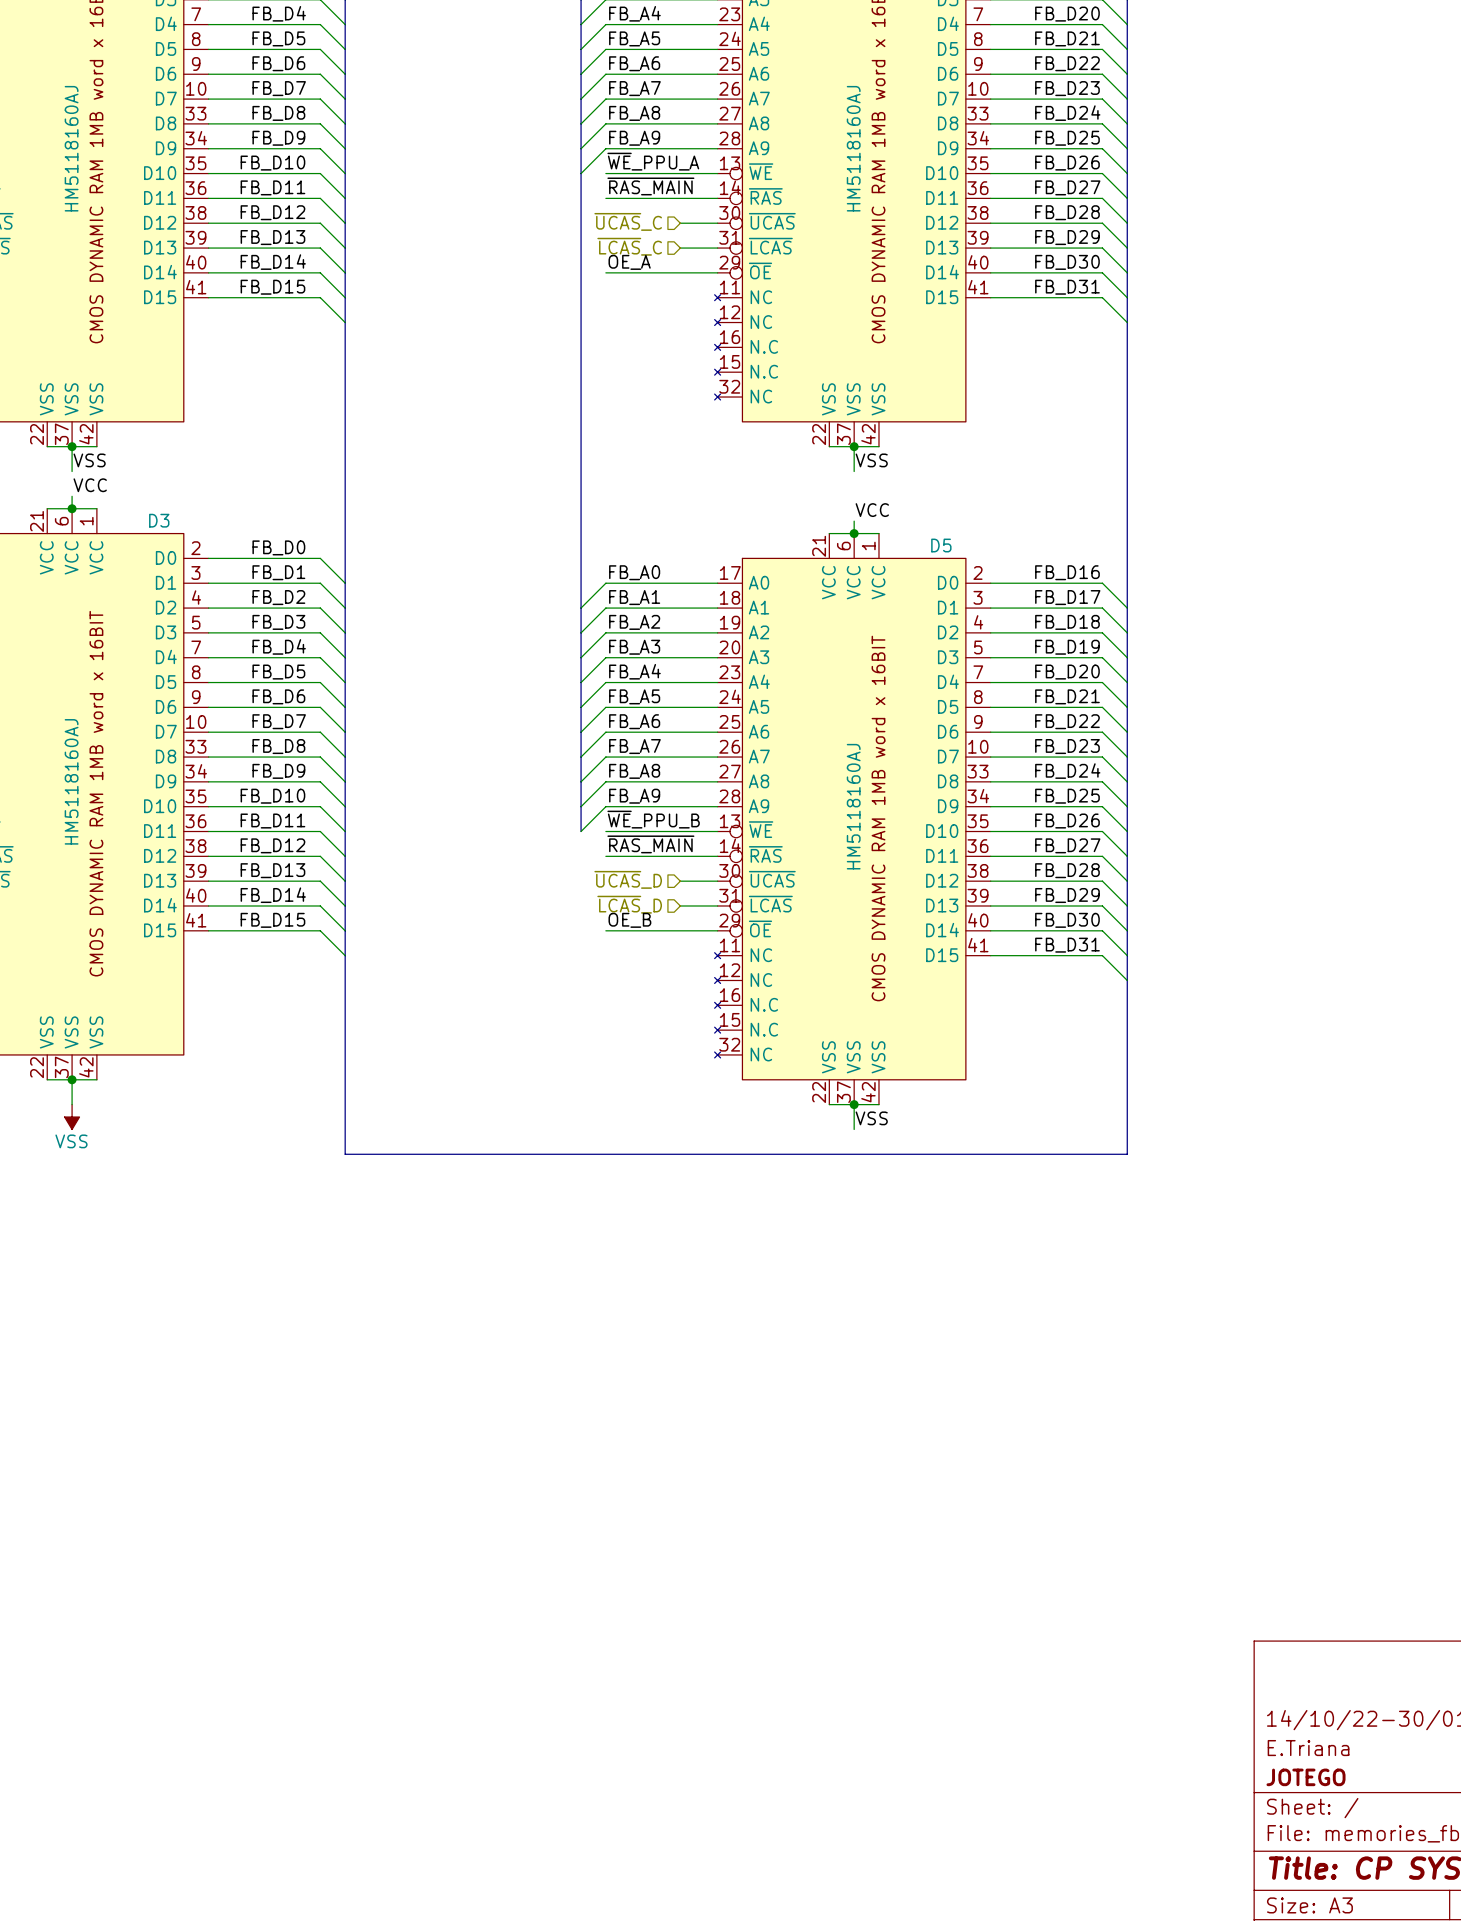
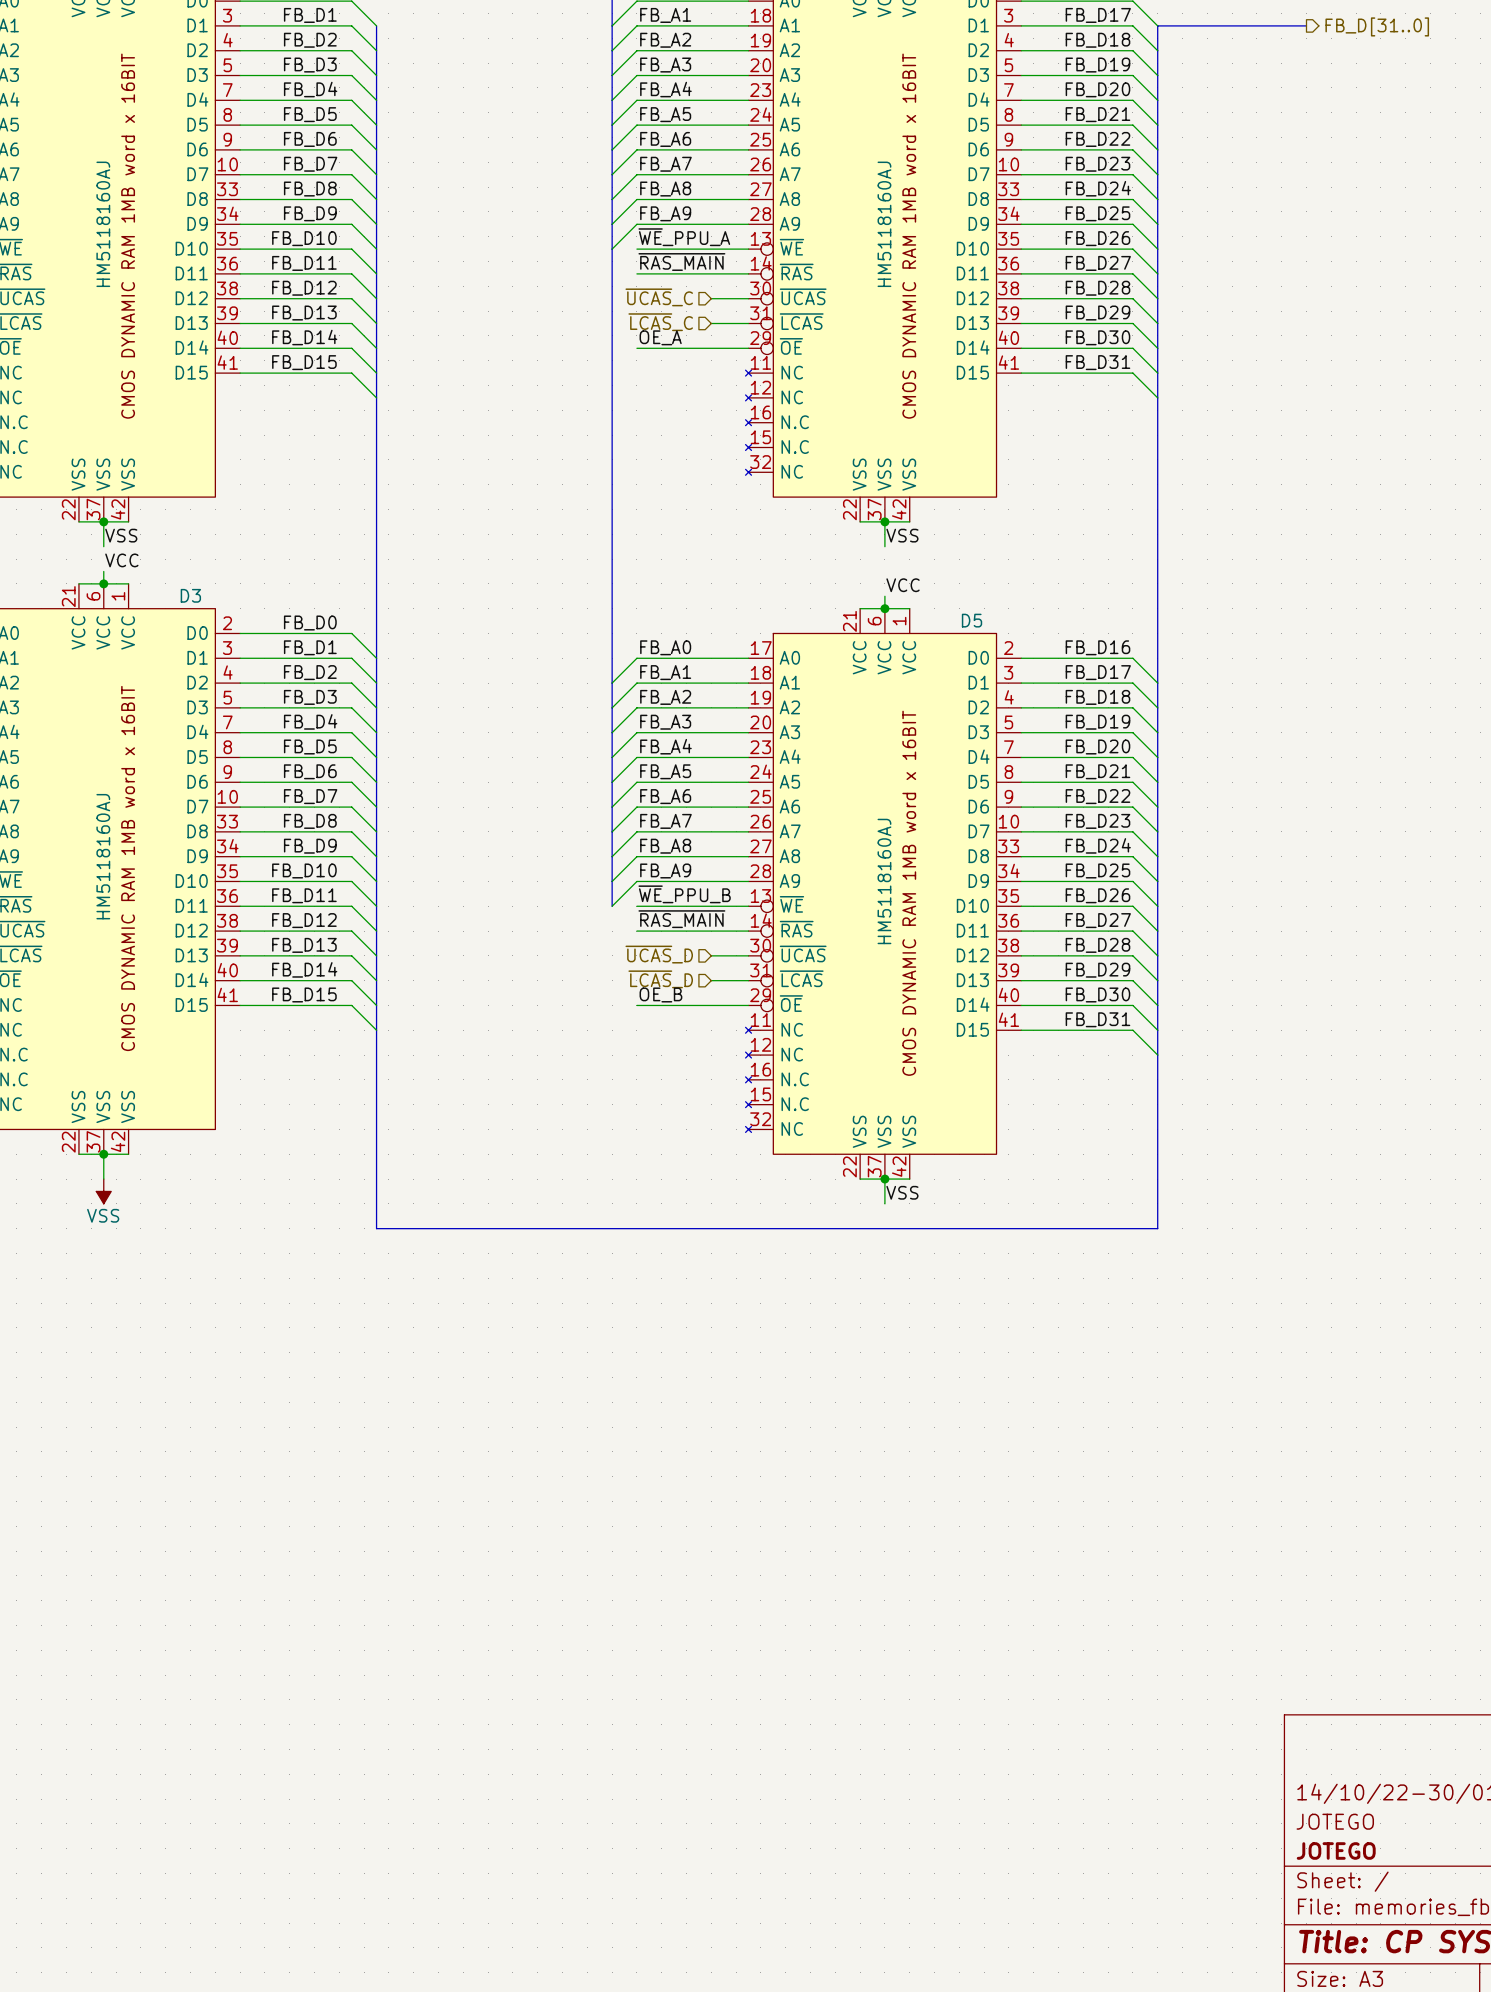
title block: E.Triana (1308, 1748) -> JOTEGO (1335, 1821)

